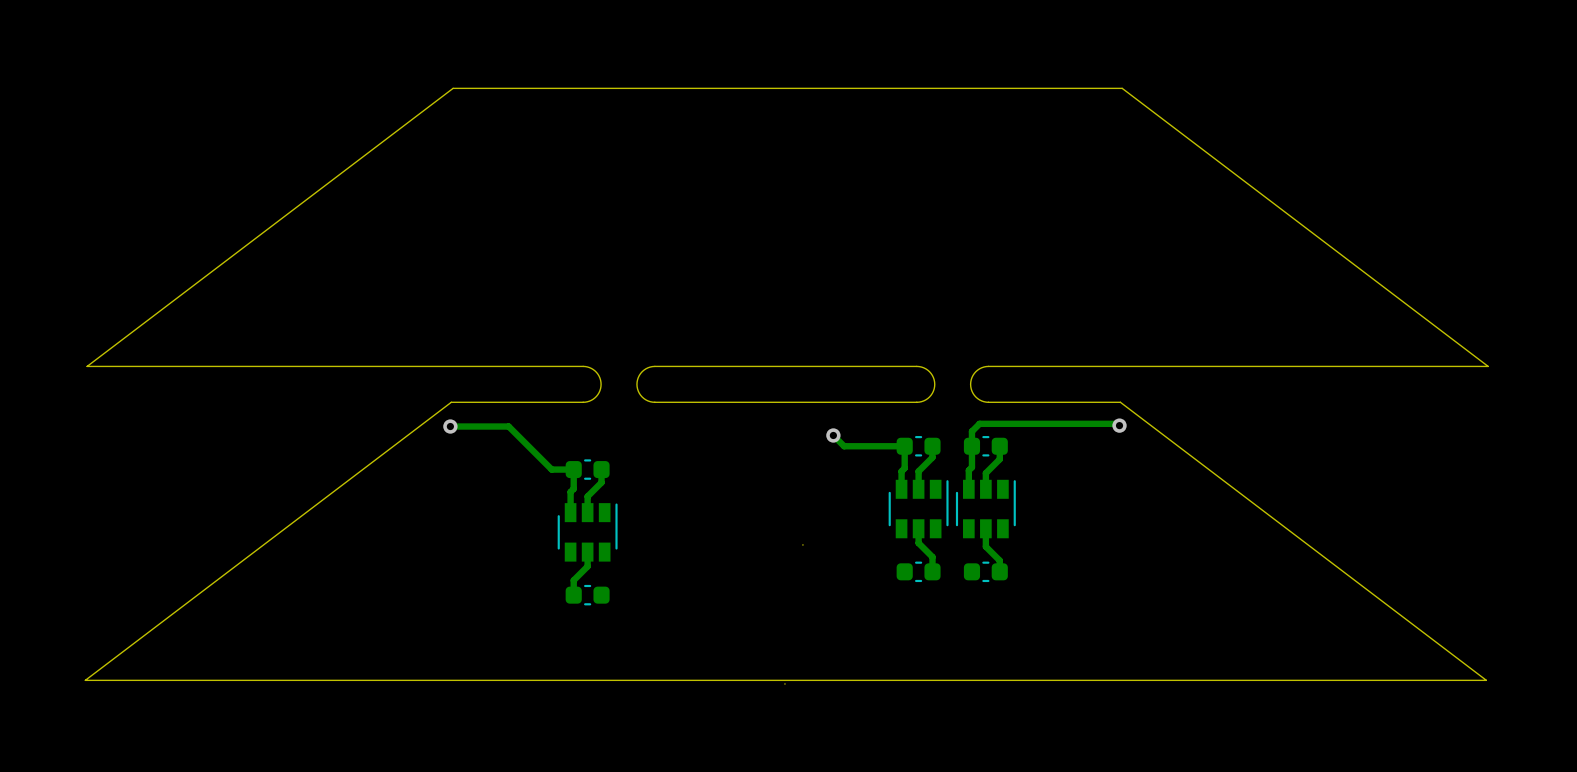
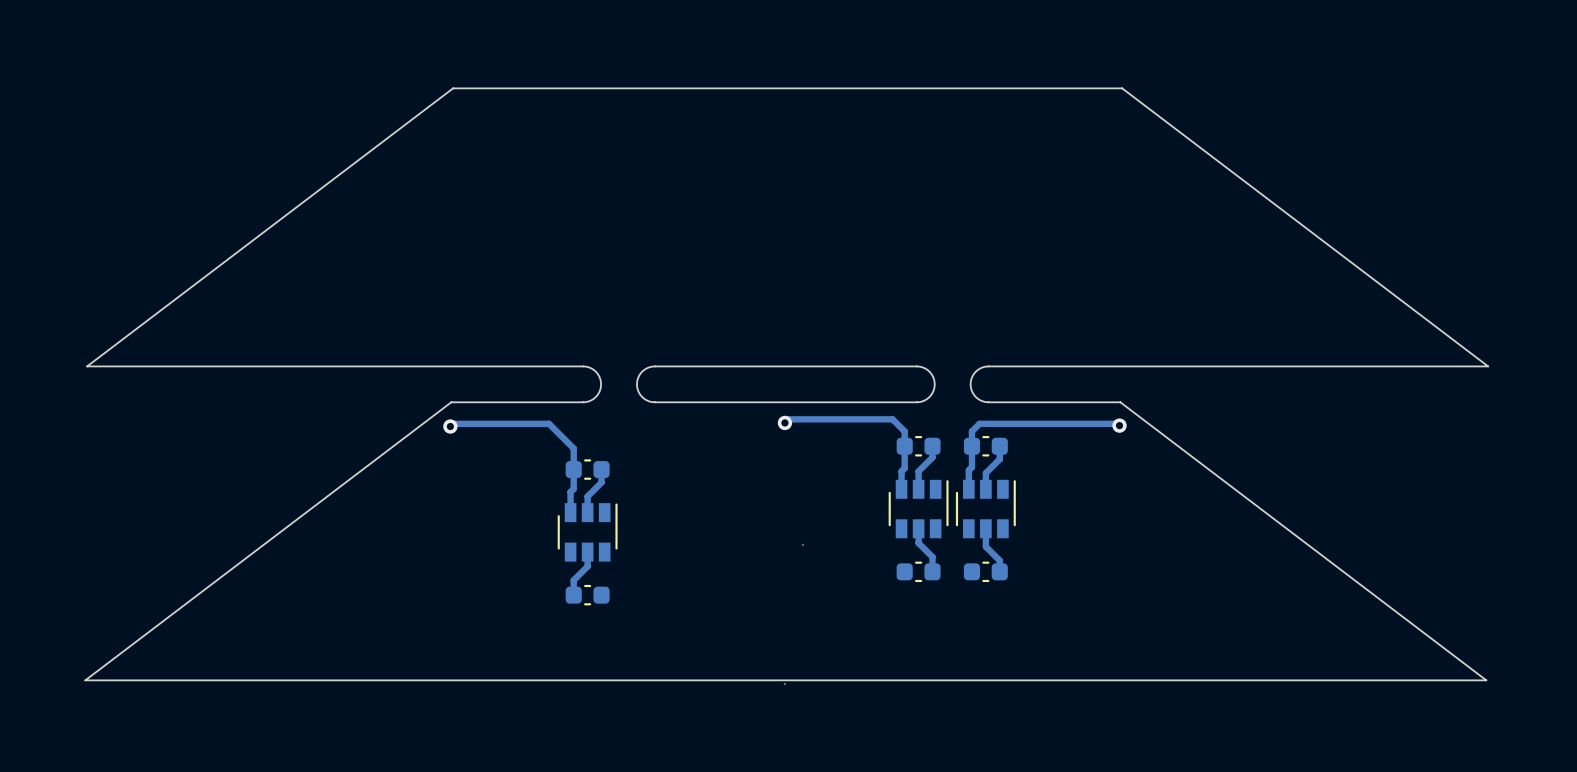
track: (450, 426) (508, 426) (551, 469) (573, 469) -> (450, 423) (549, 423) (573, 448) (573, 469)
track: (833, 435) (844, 446) (904, 446) -> (784, 422) (788, 419) (892, 419) (904, 431) (904, 446)
via position: (833, 435) -> (784, 422)

